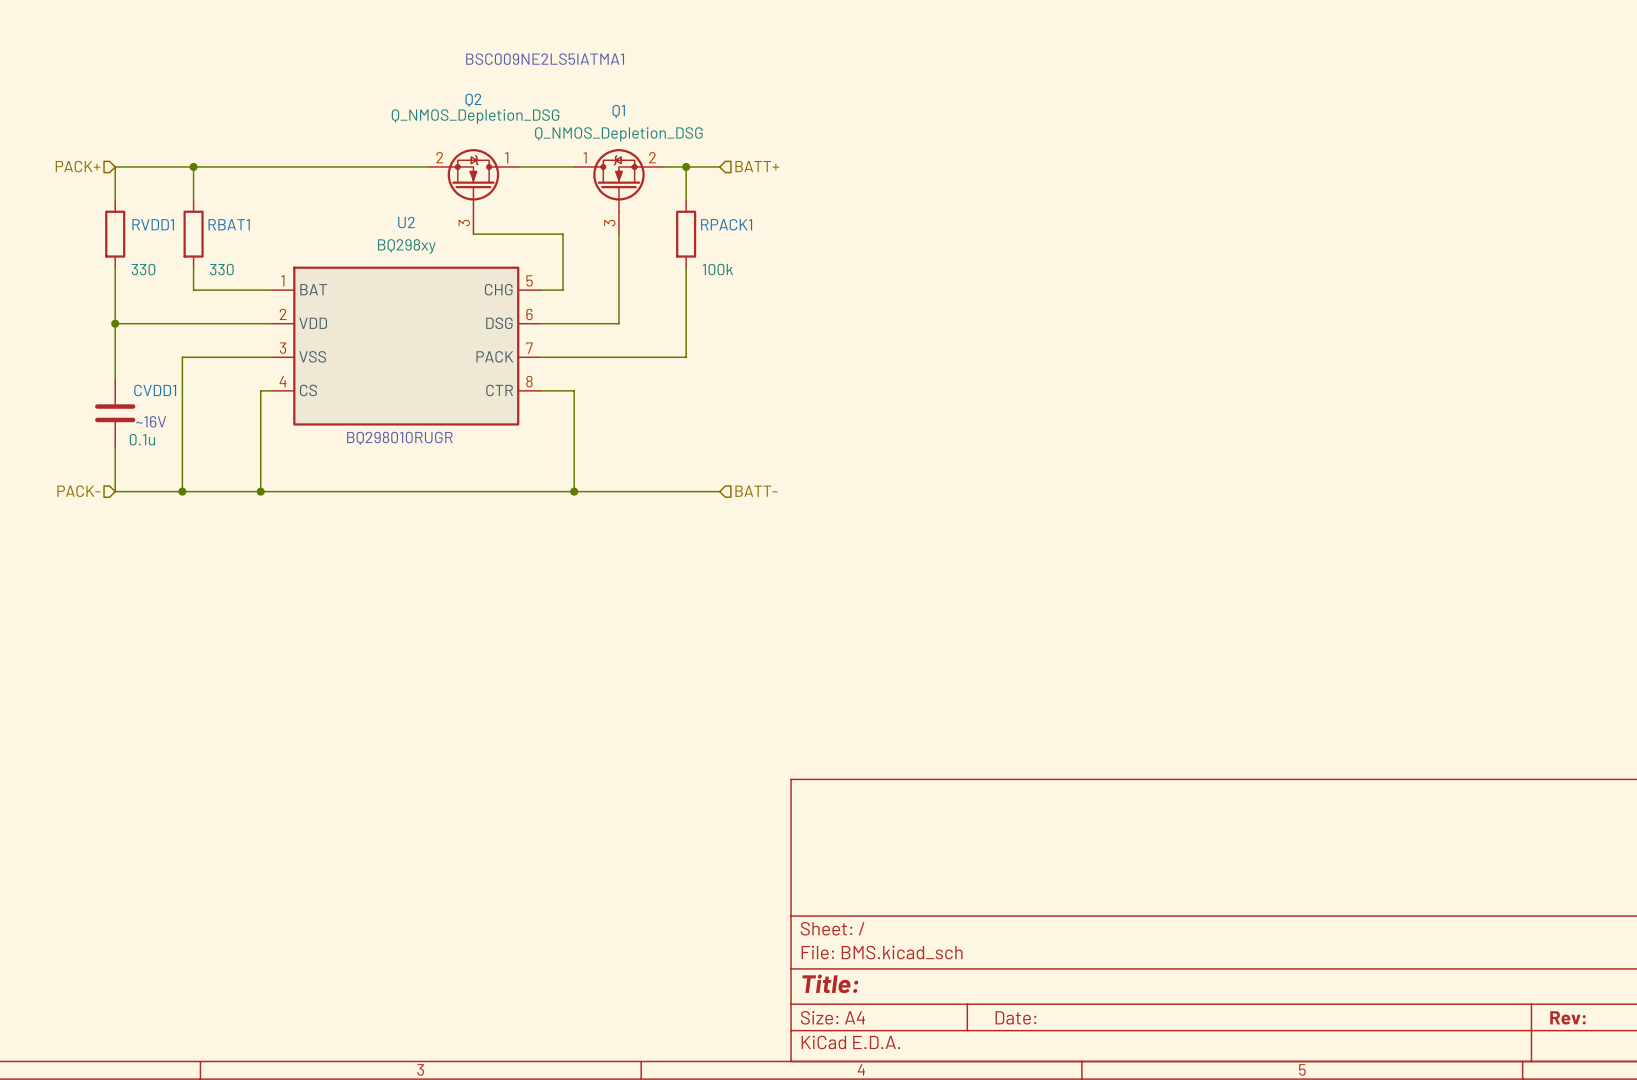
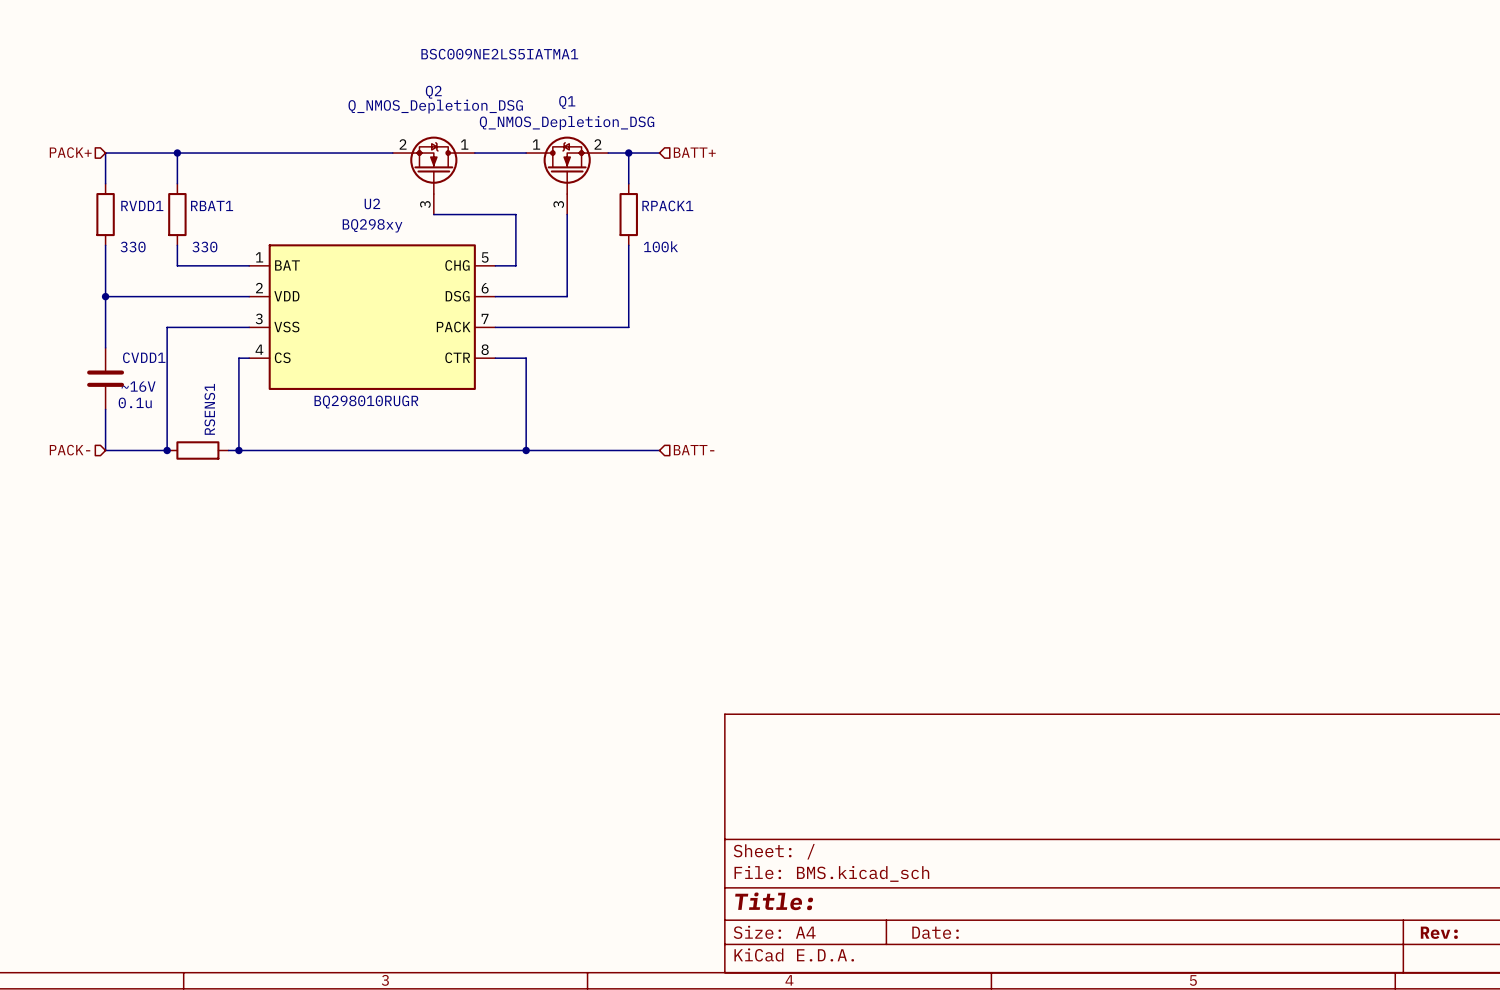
wire: (182, 491) (249, 491) -> none
RSENS1: none -> (197, 450)

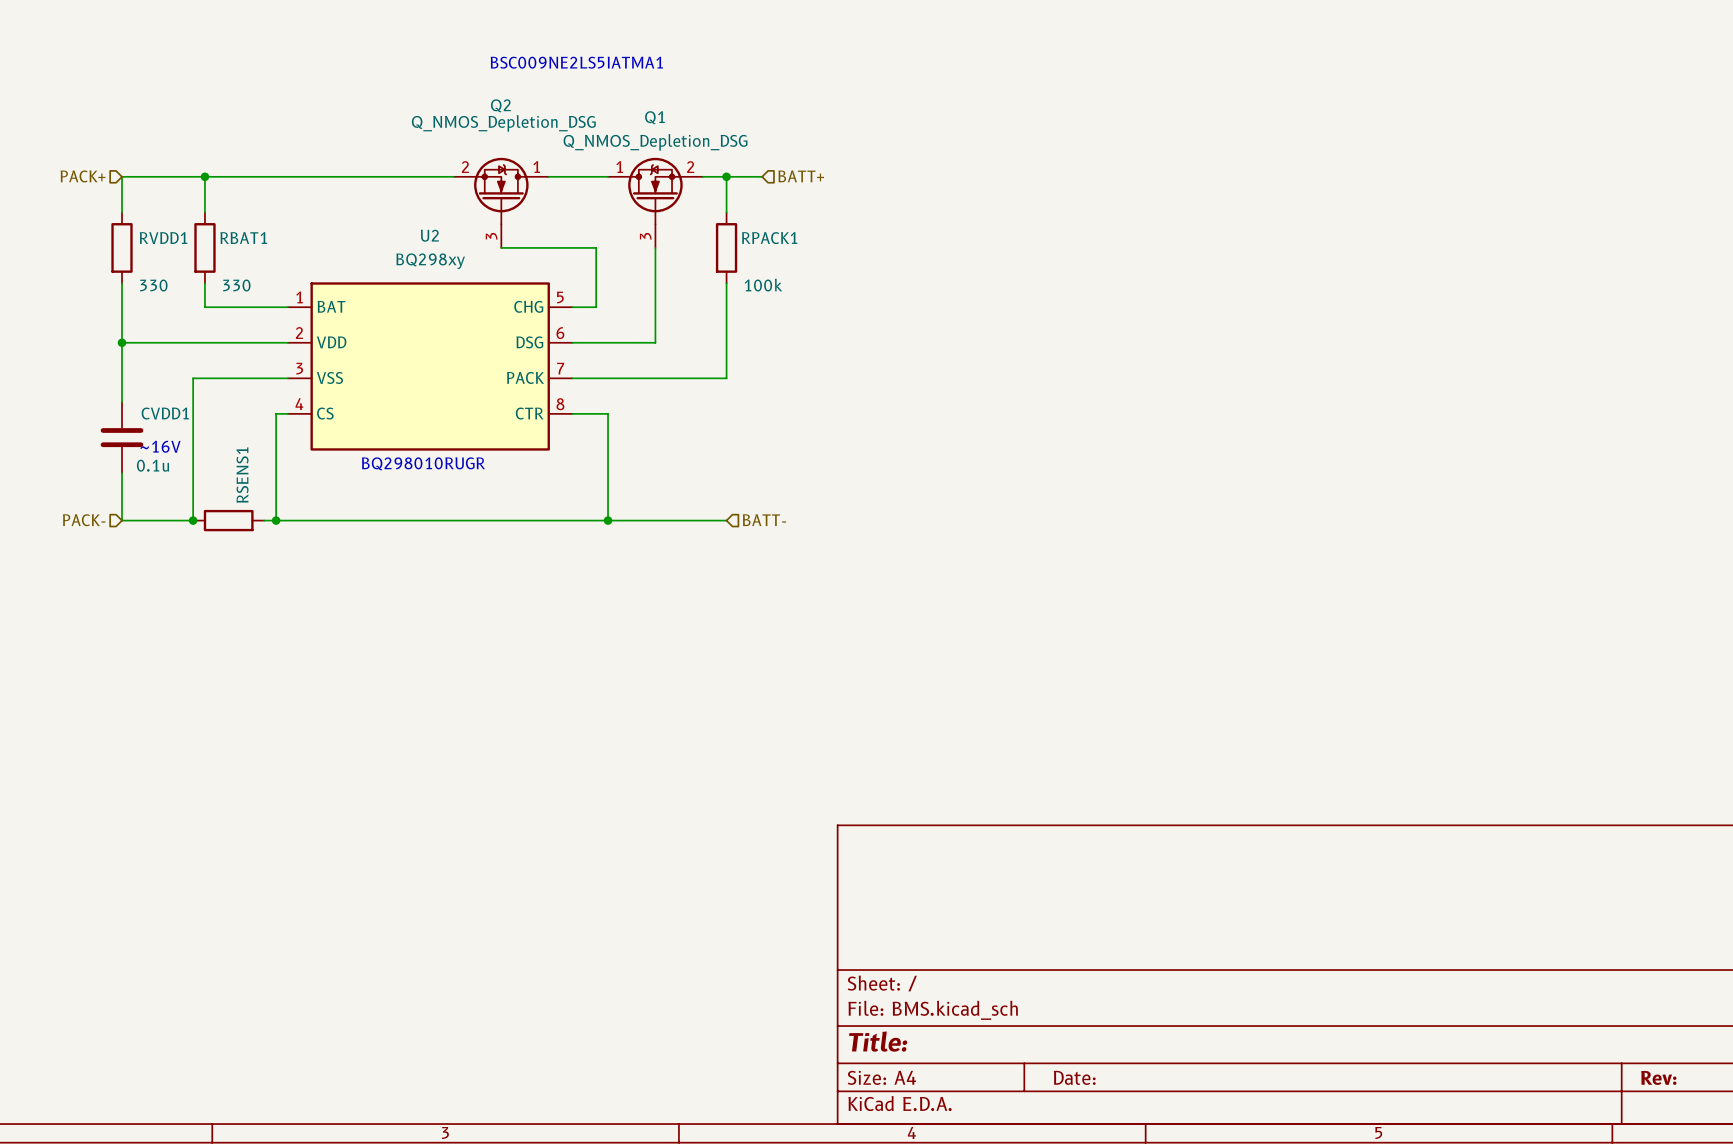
wire: (628, 450) (659, 450) -> none
hierarchical label position: BATT- (694, 450) -> BATT- (764, 520)

